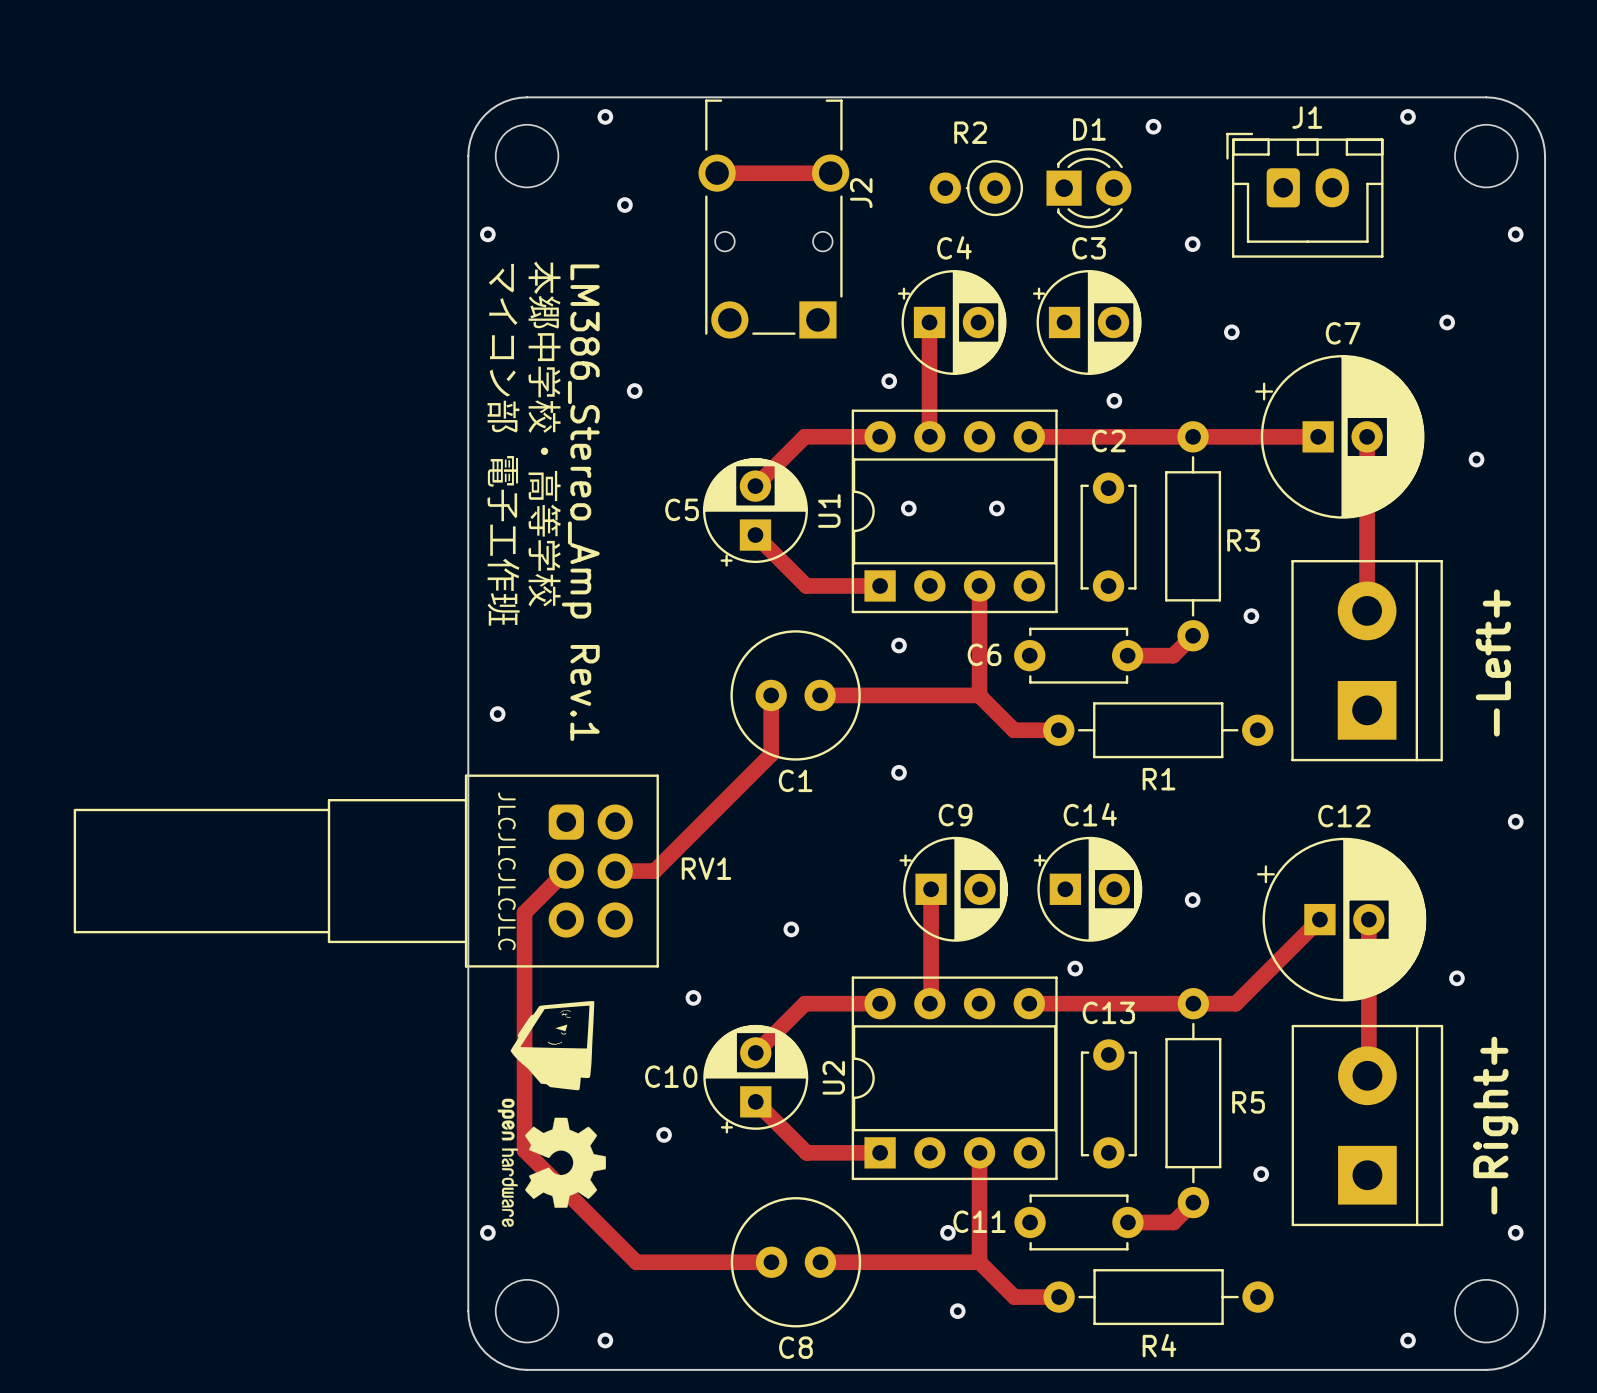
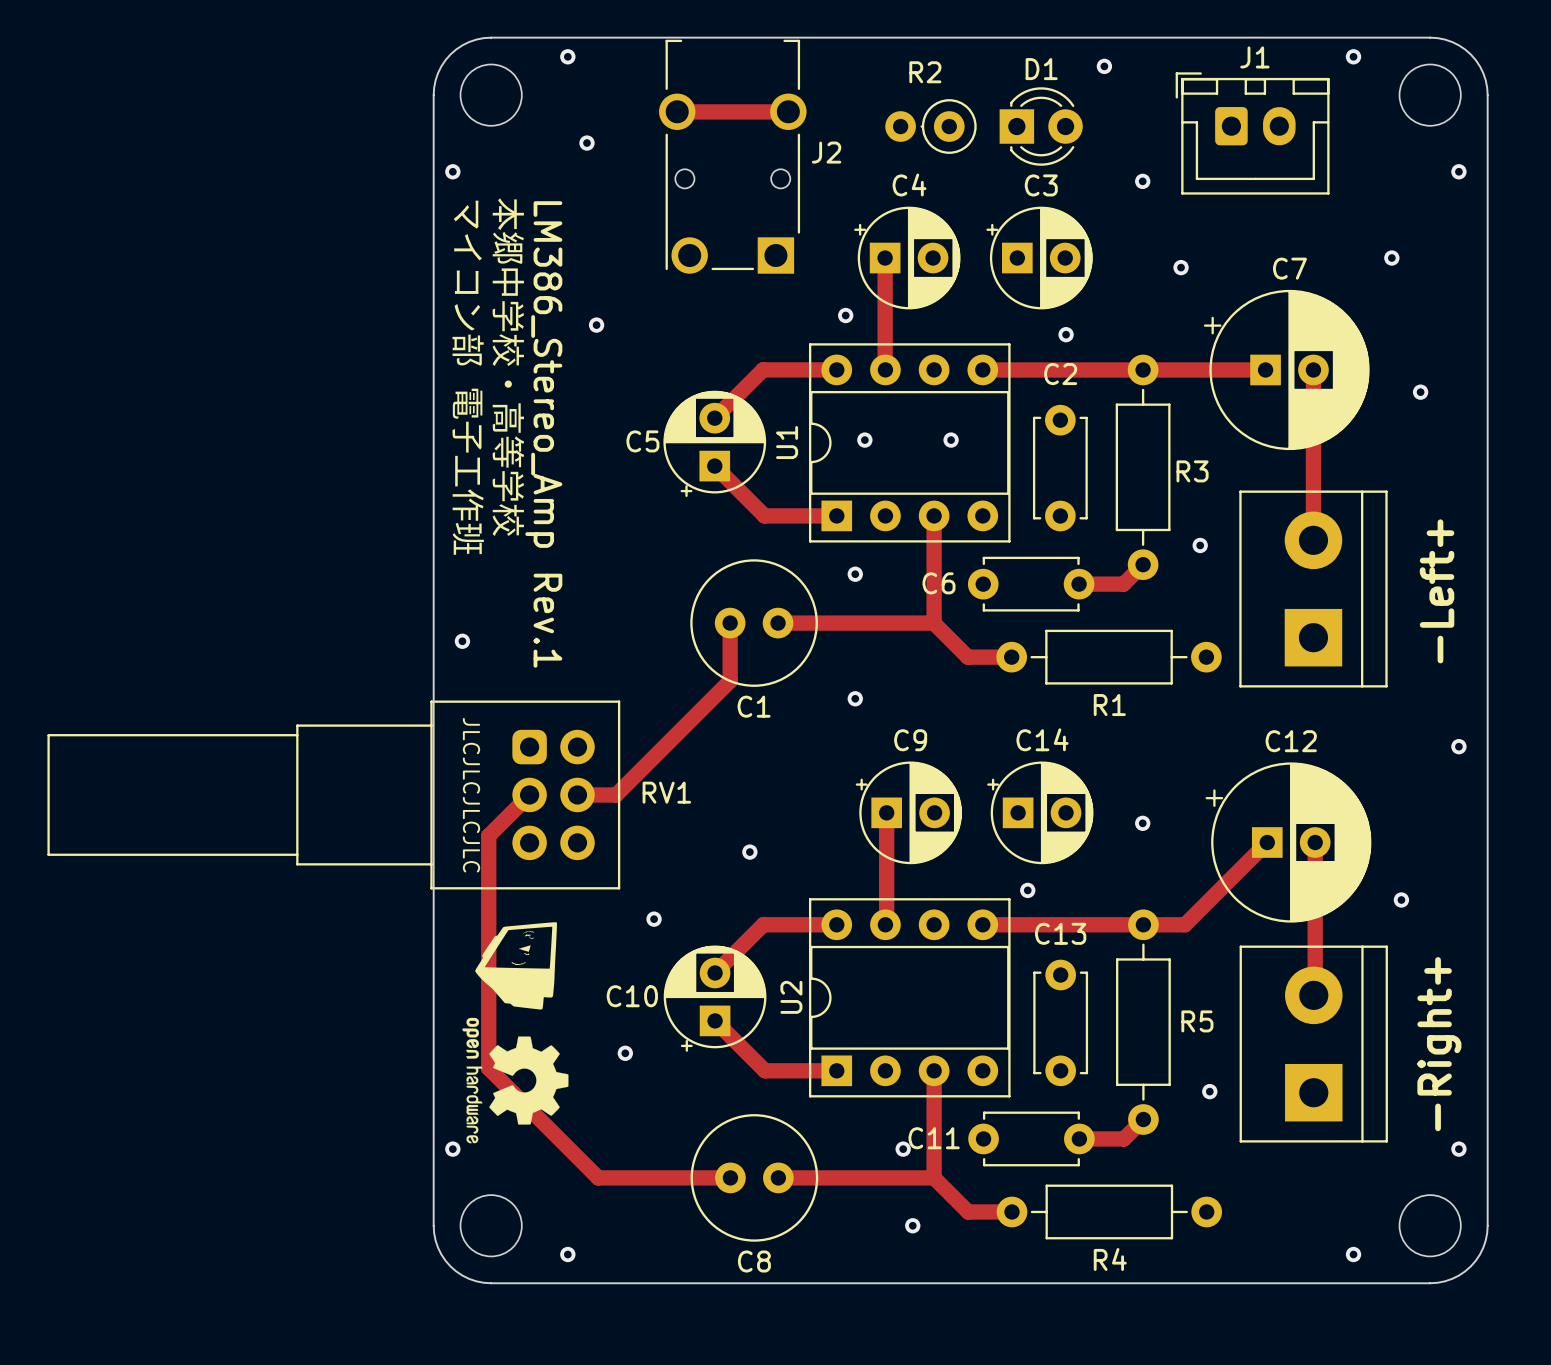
J2 name rotation: 0° (861, 193) -> 90° clockwise (826, 152)

